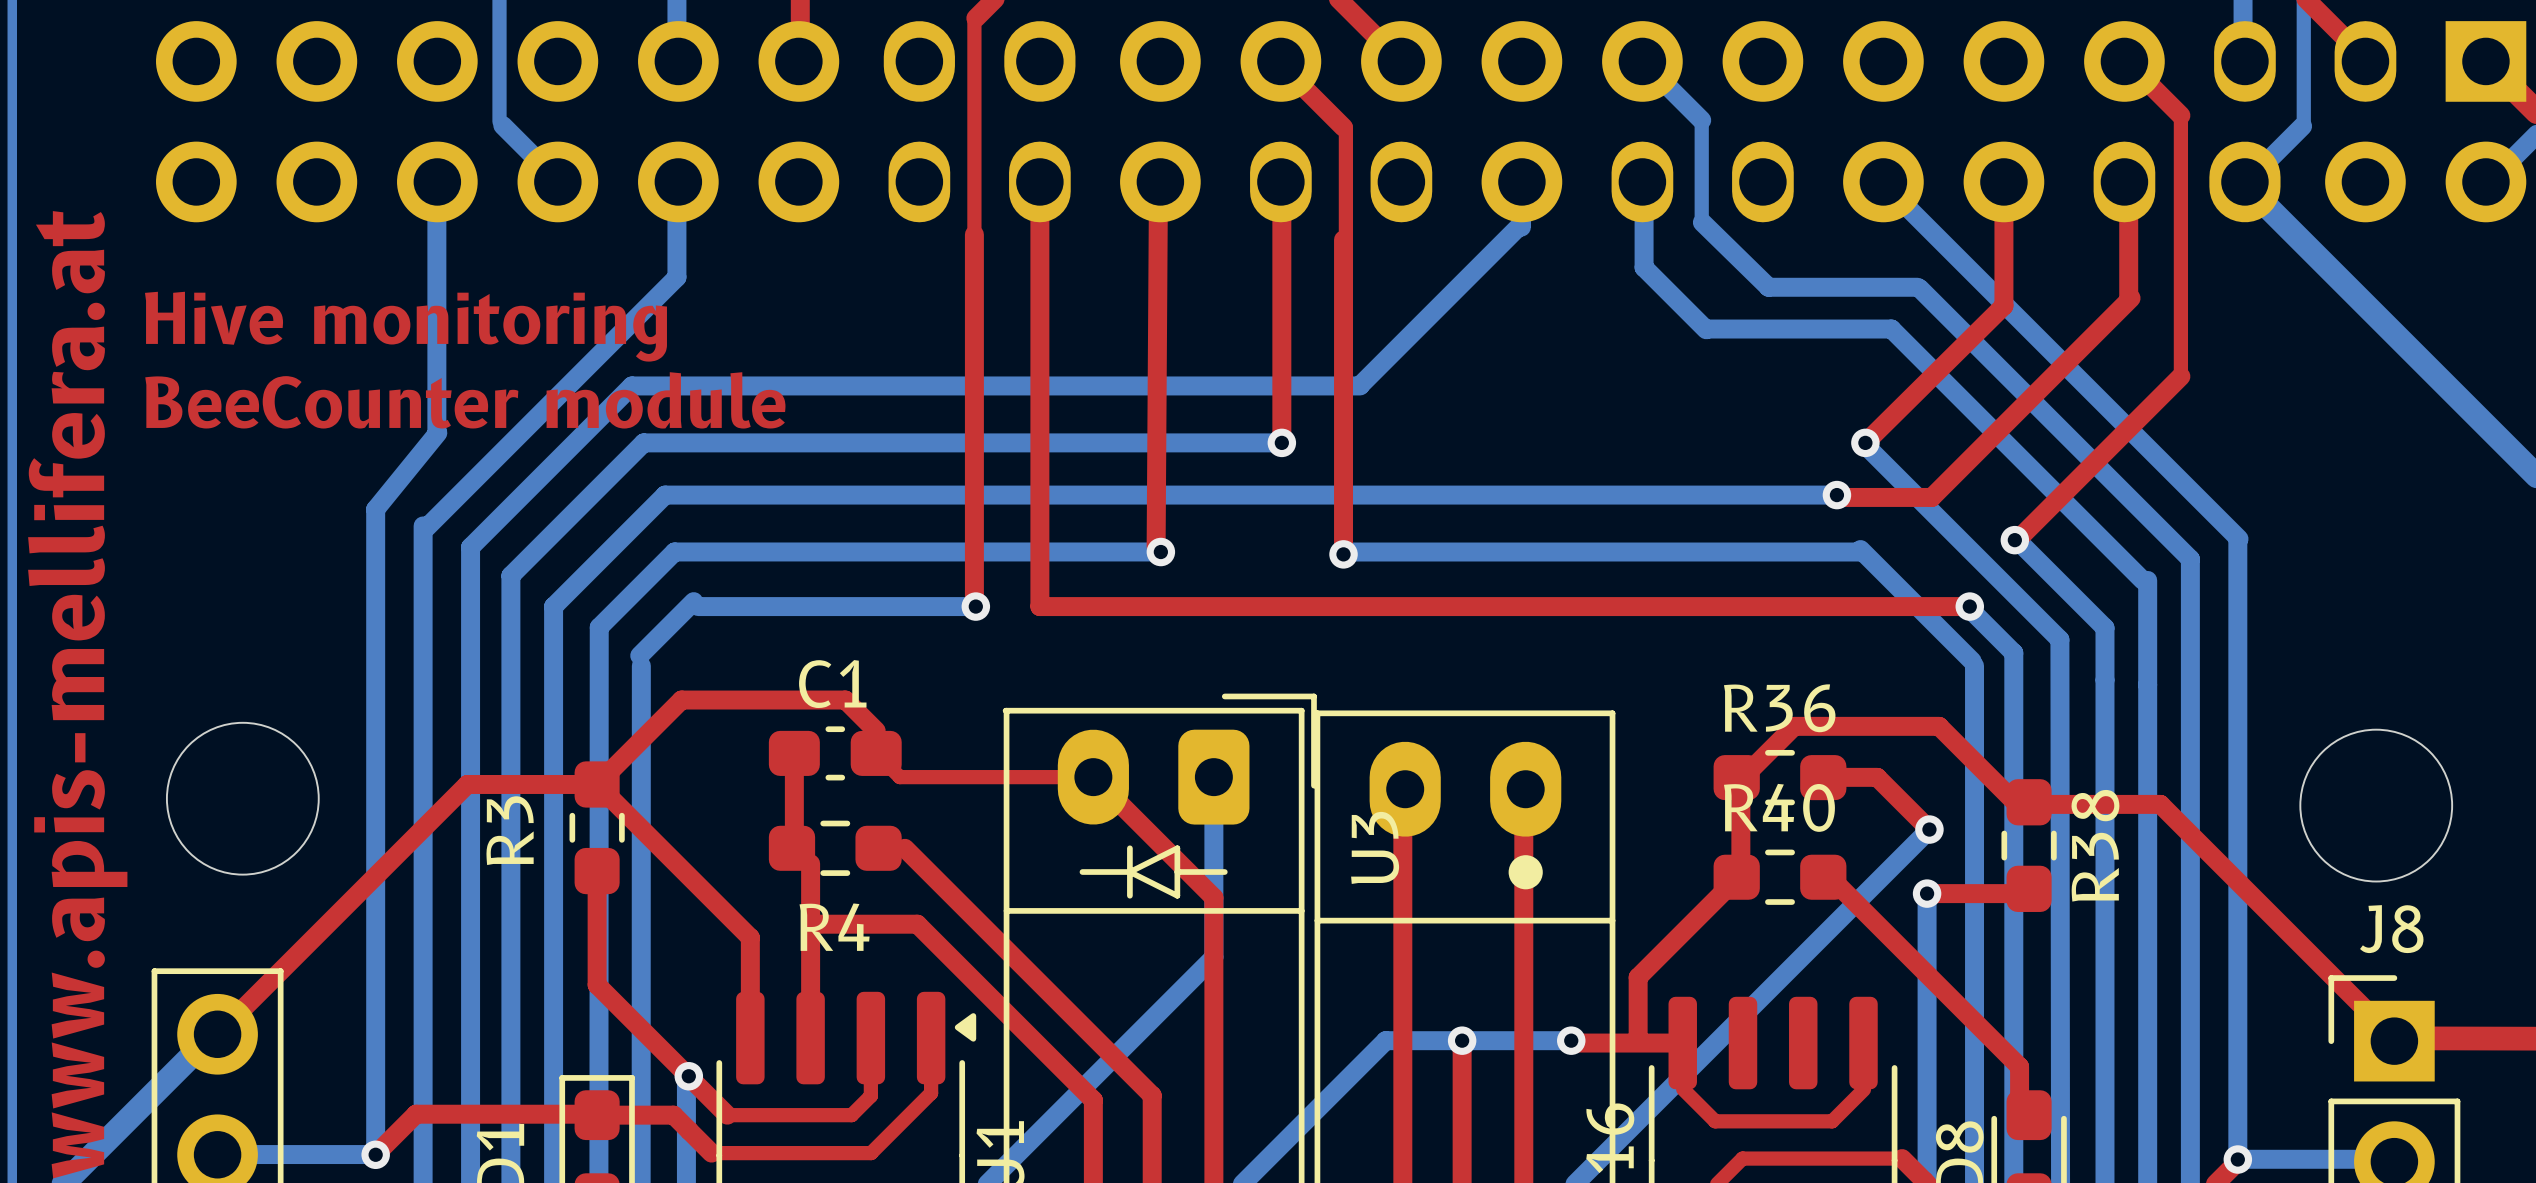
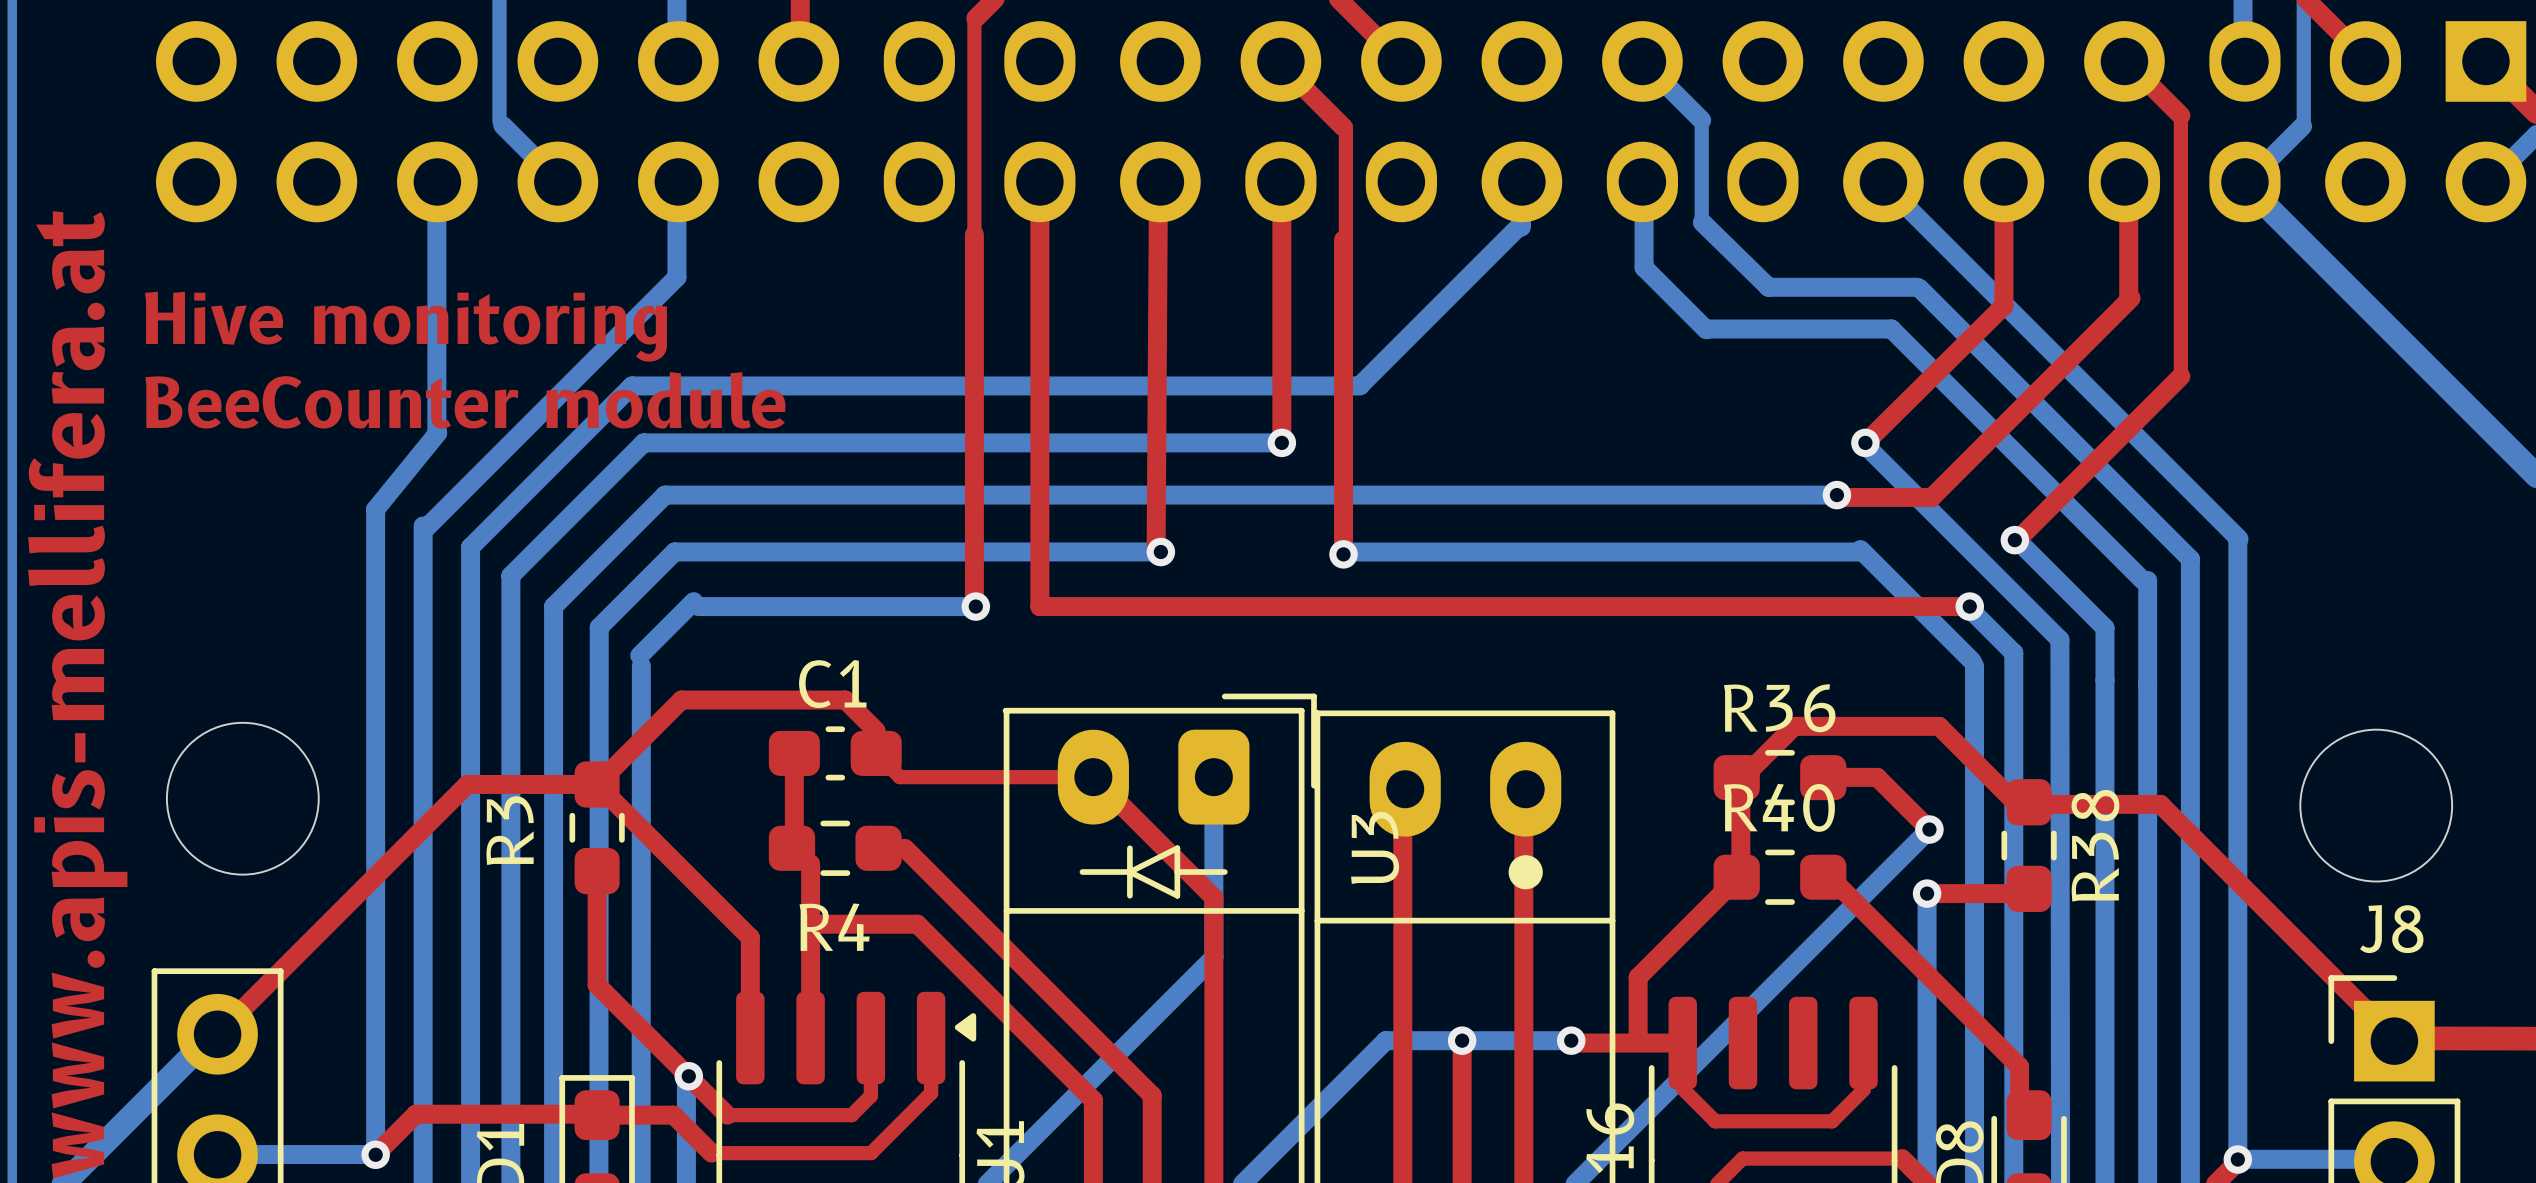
part footprint: [156, 21, 2527, 223] -> [156, 21, 2527, 223]

